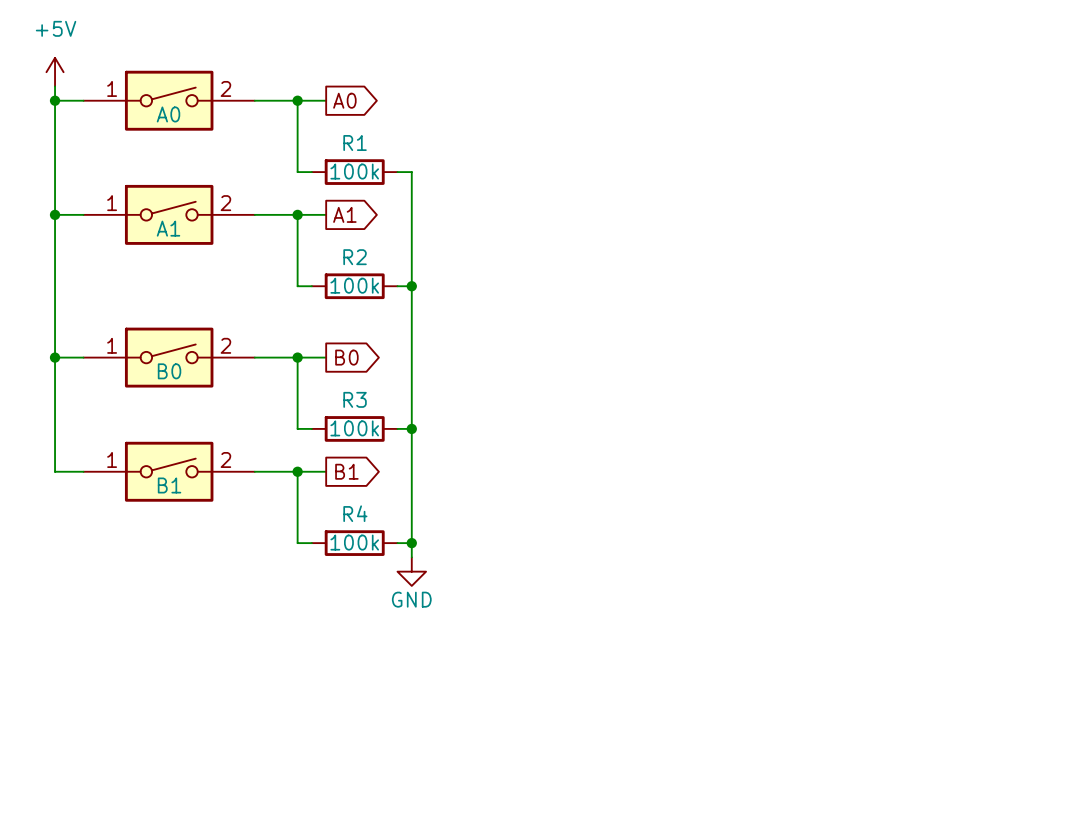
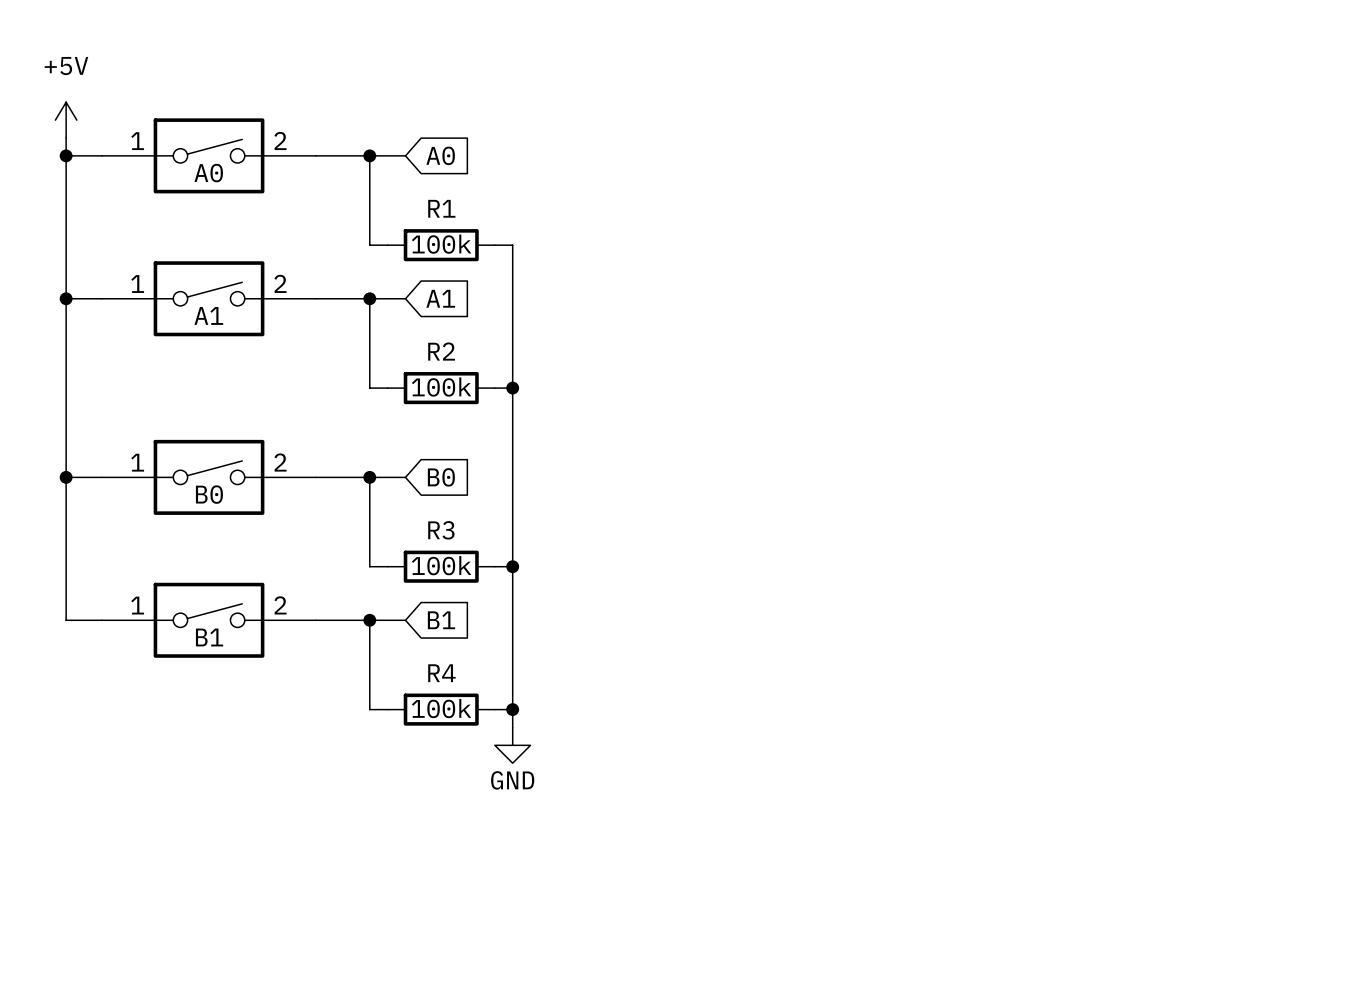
global label shape: output (344, 100) -> input (440, 155)
global label shape: output (344, 214) -> input (440, 298)
global label shape: output (346, 357) -> input (441, 477)
global label shape: output (346, 471) -> input (441, 620)

